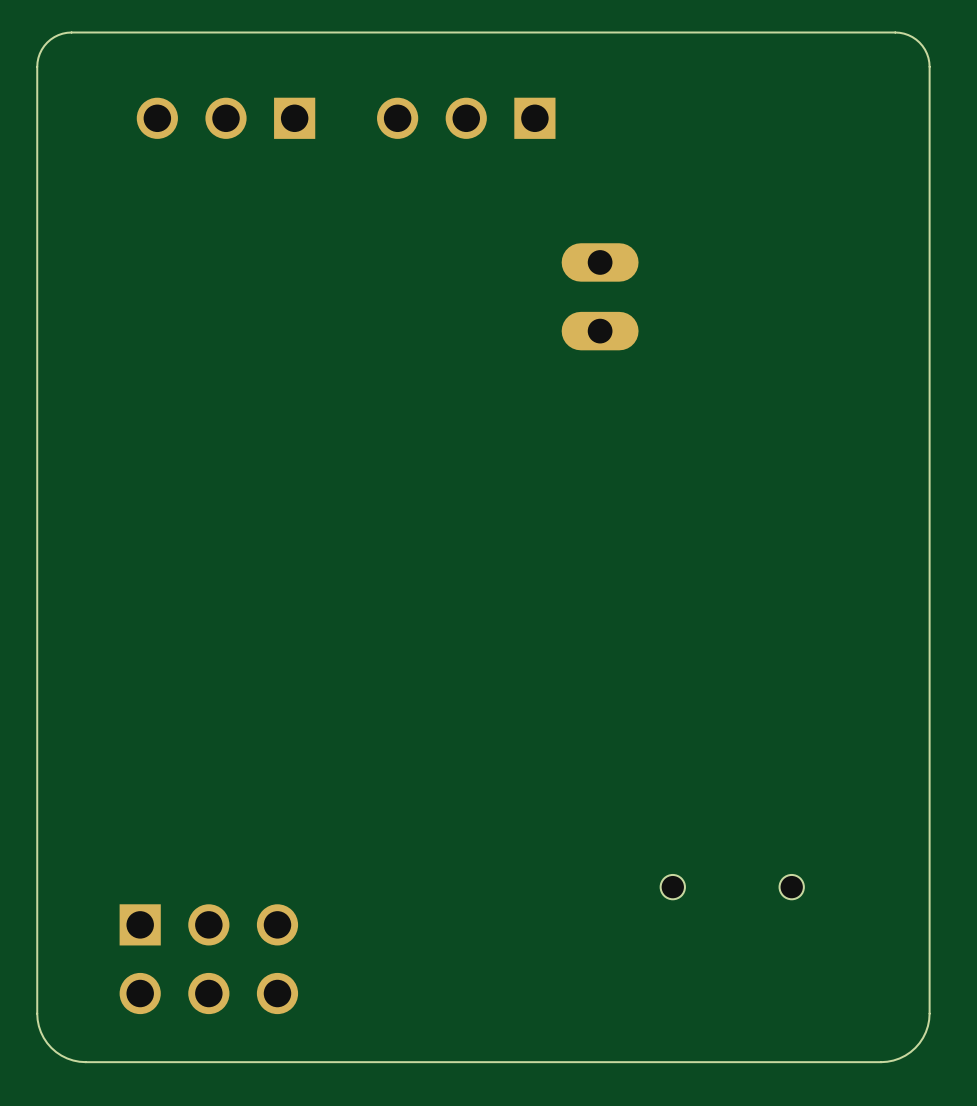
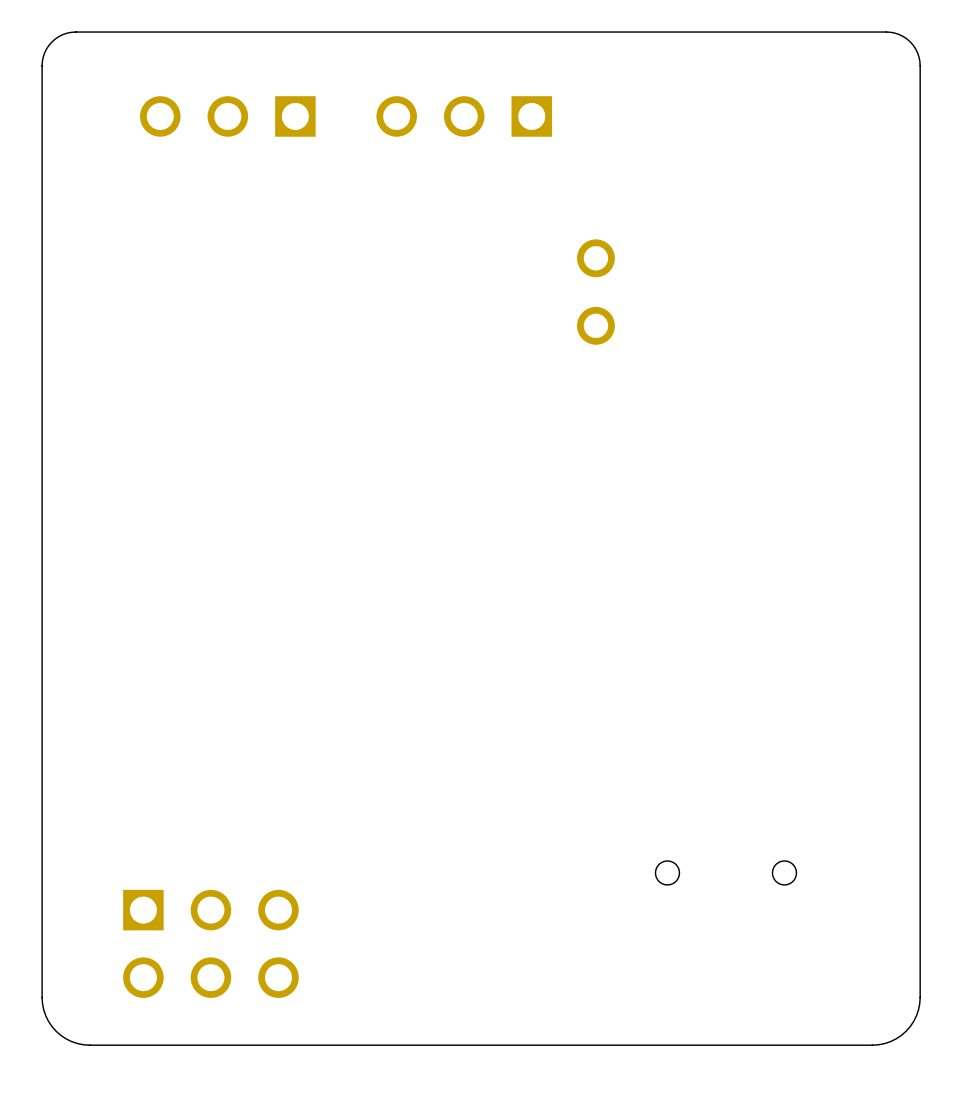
part footprint: [561, 243, 639, 351] -> [577, 239, 615, 345]

